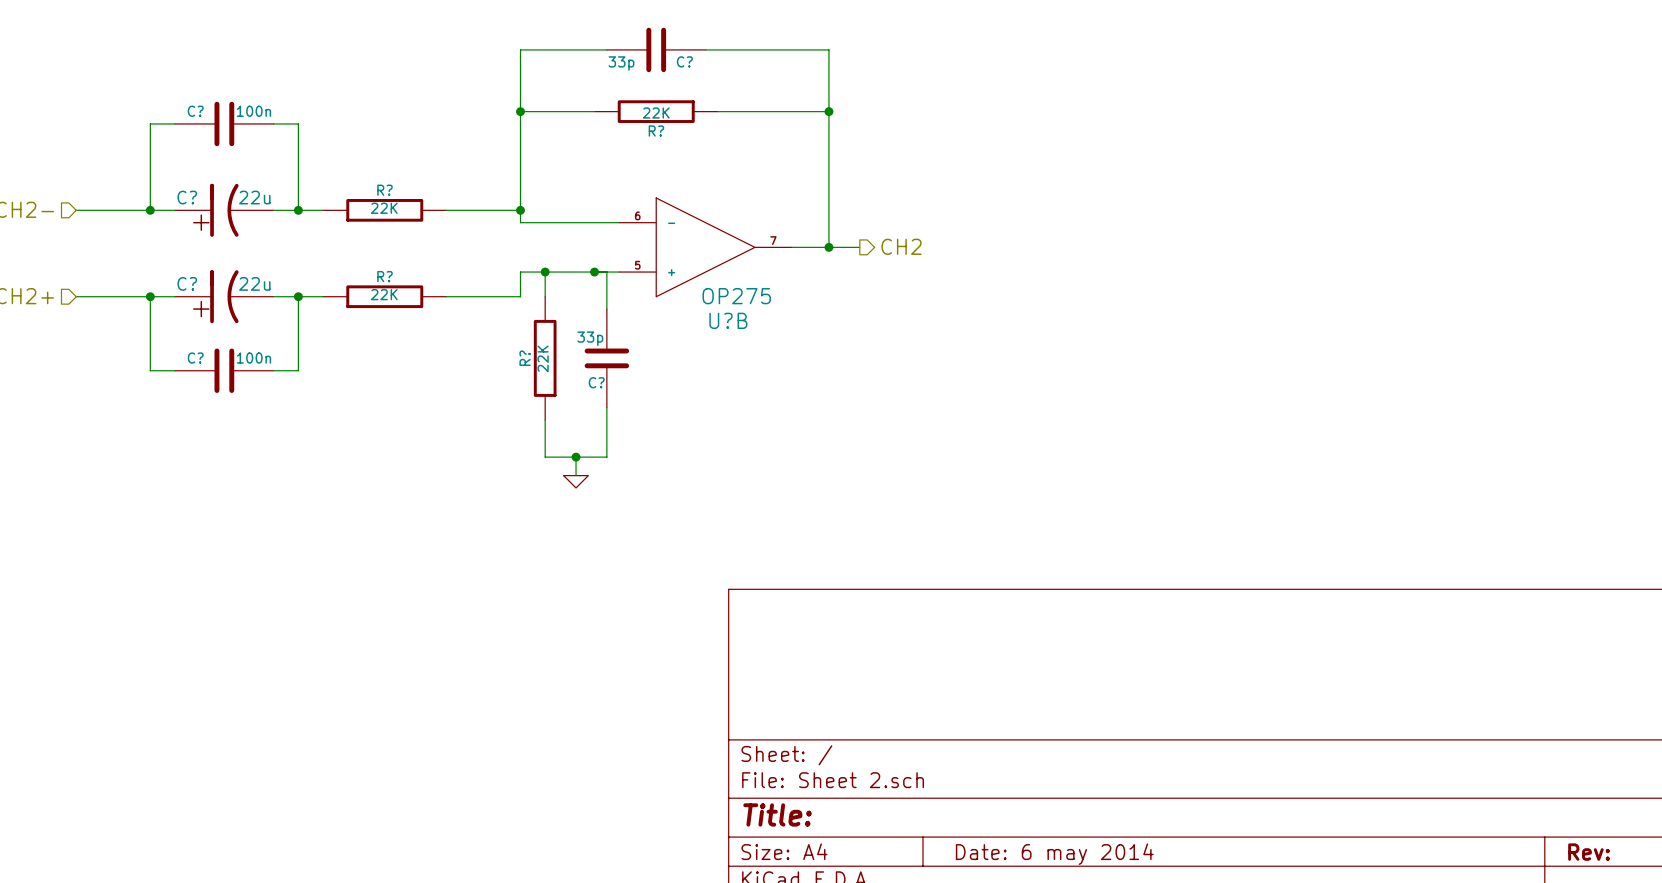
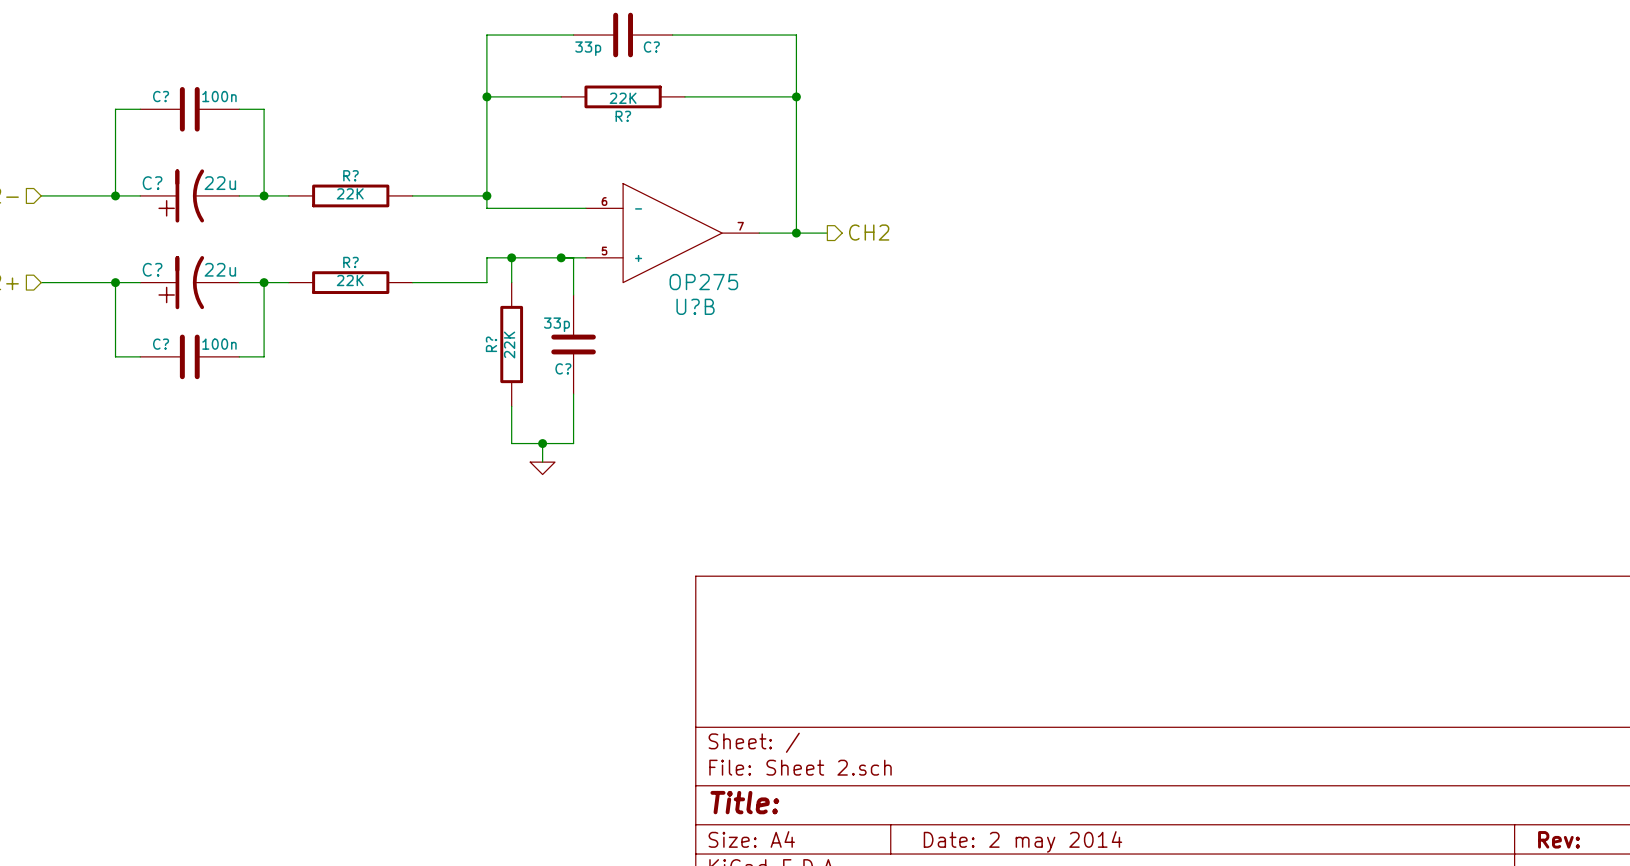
title block: Date: 6 may 2014 (1054, 854) -> Date: 2 may 2014 (1022, 841)

